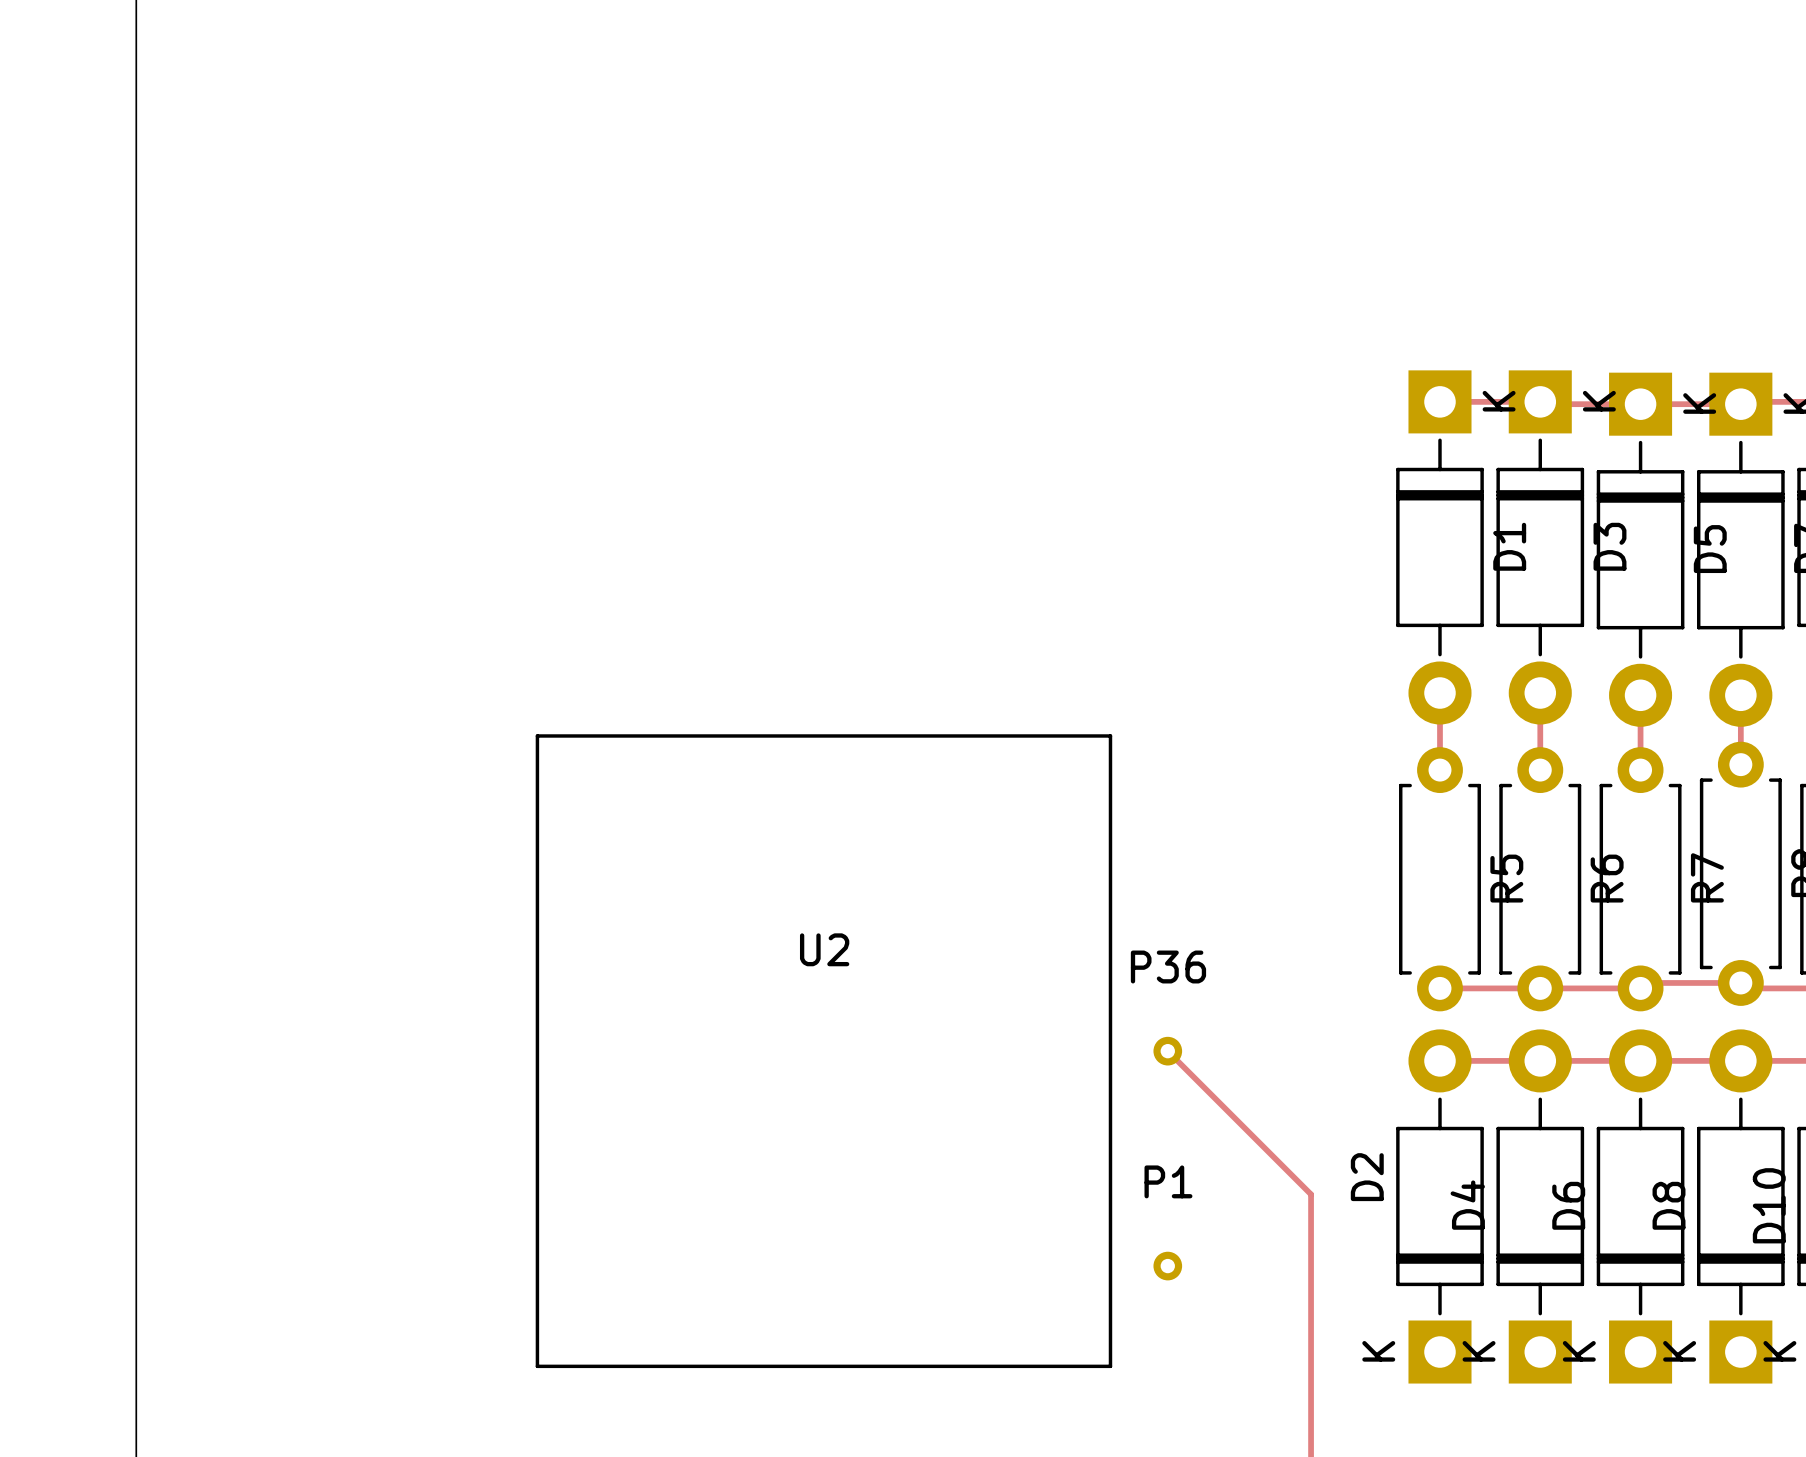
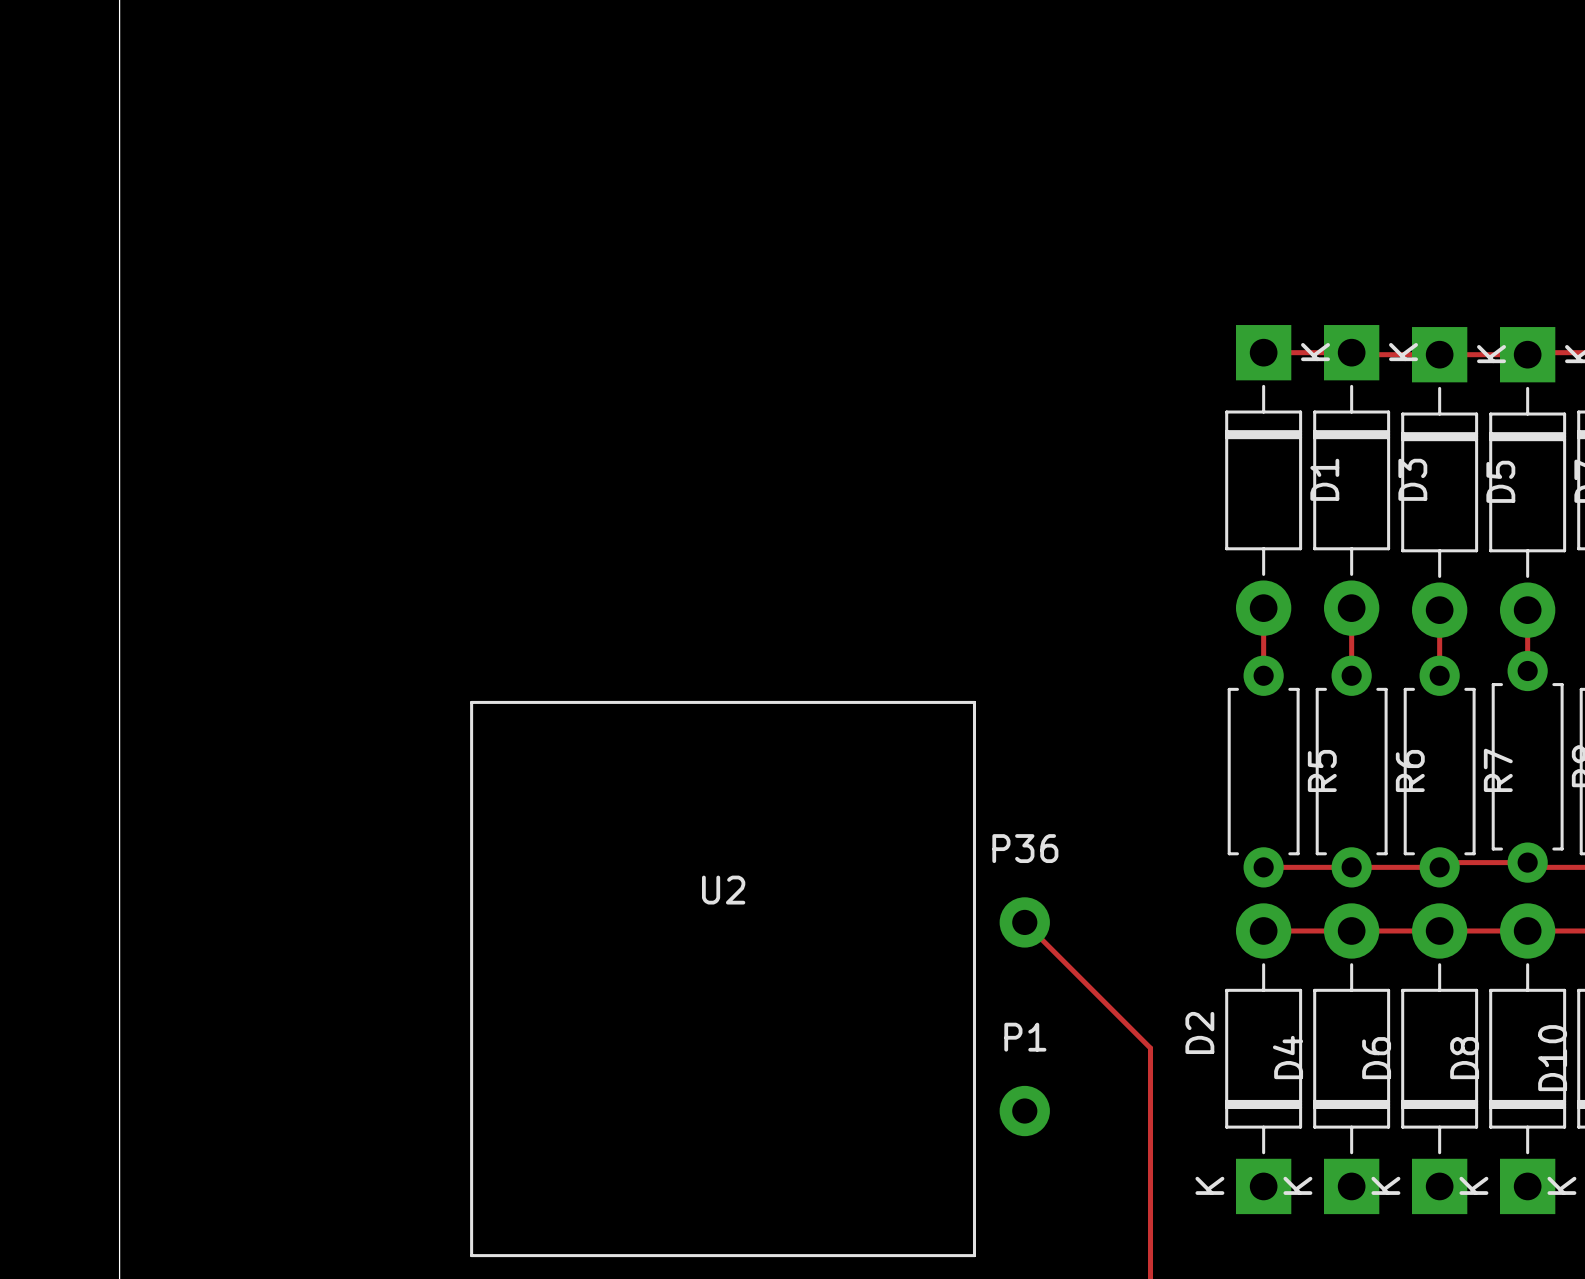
P36 footprint: [1153, 1036, 1183, 1066] -> [999, 897, 1050, 948]
U2 position: (823, 1051) -> (723, 979)
P1 footprint: [1153, 1251, 1183, 1281] -> [999, 1085, 1050, 1137]

